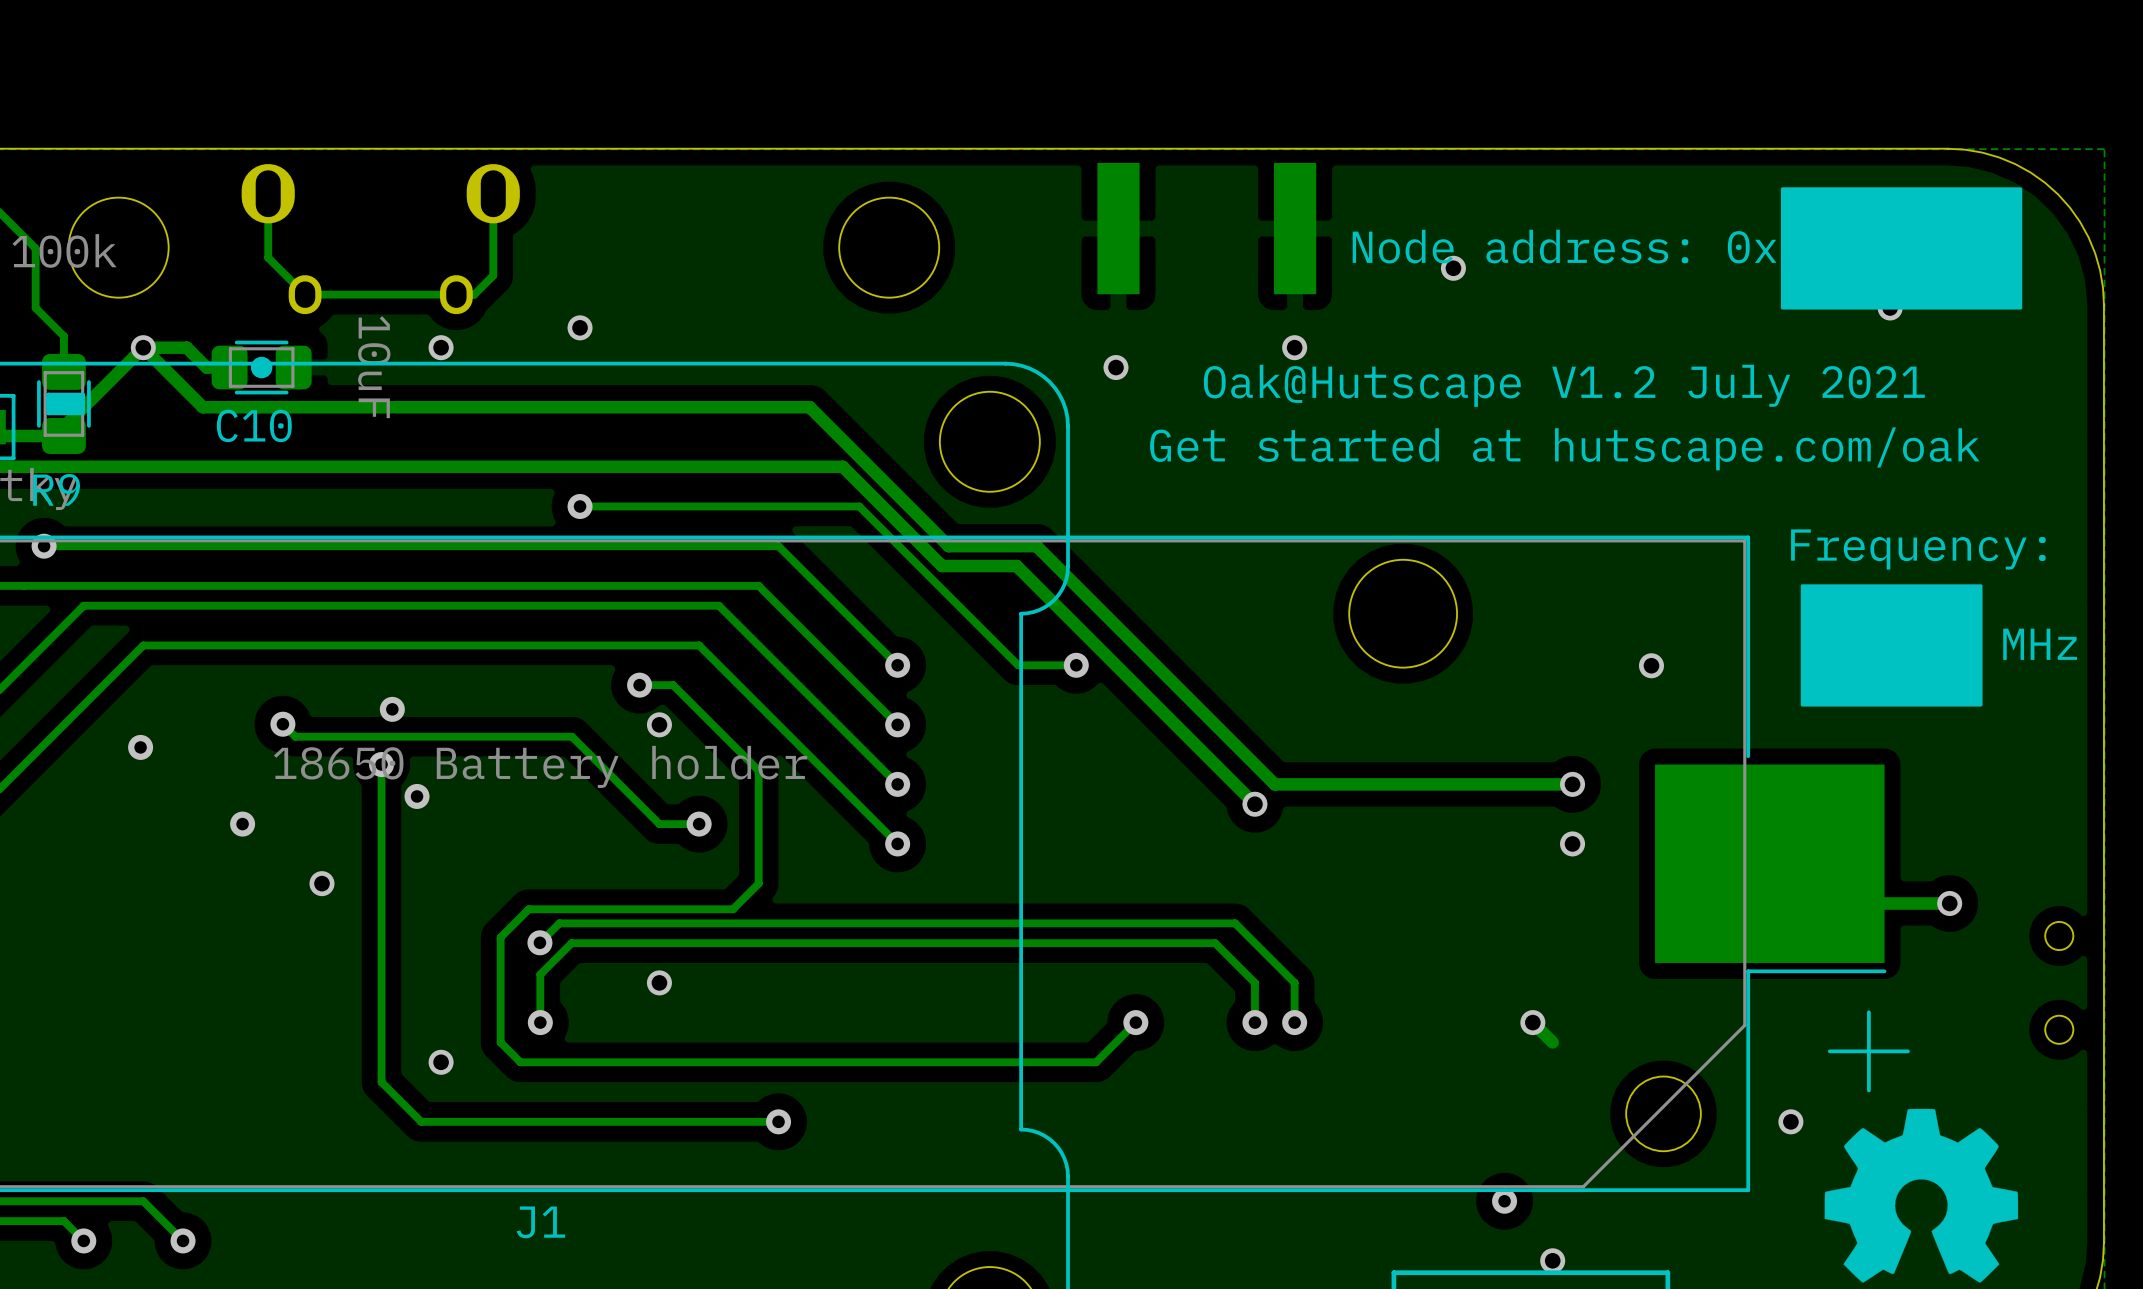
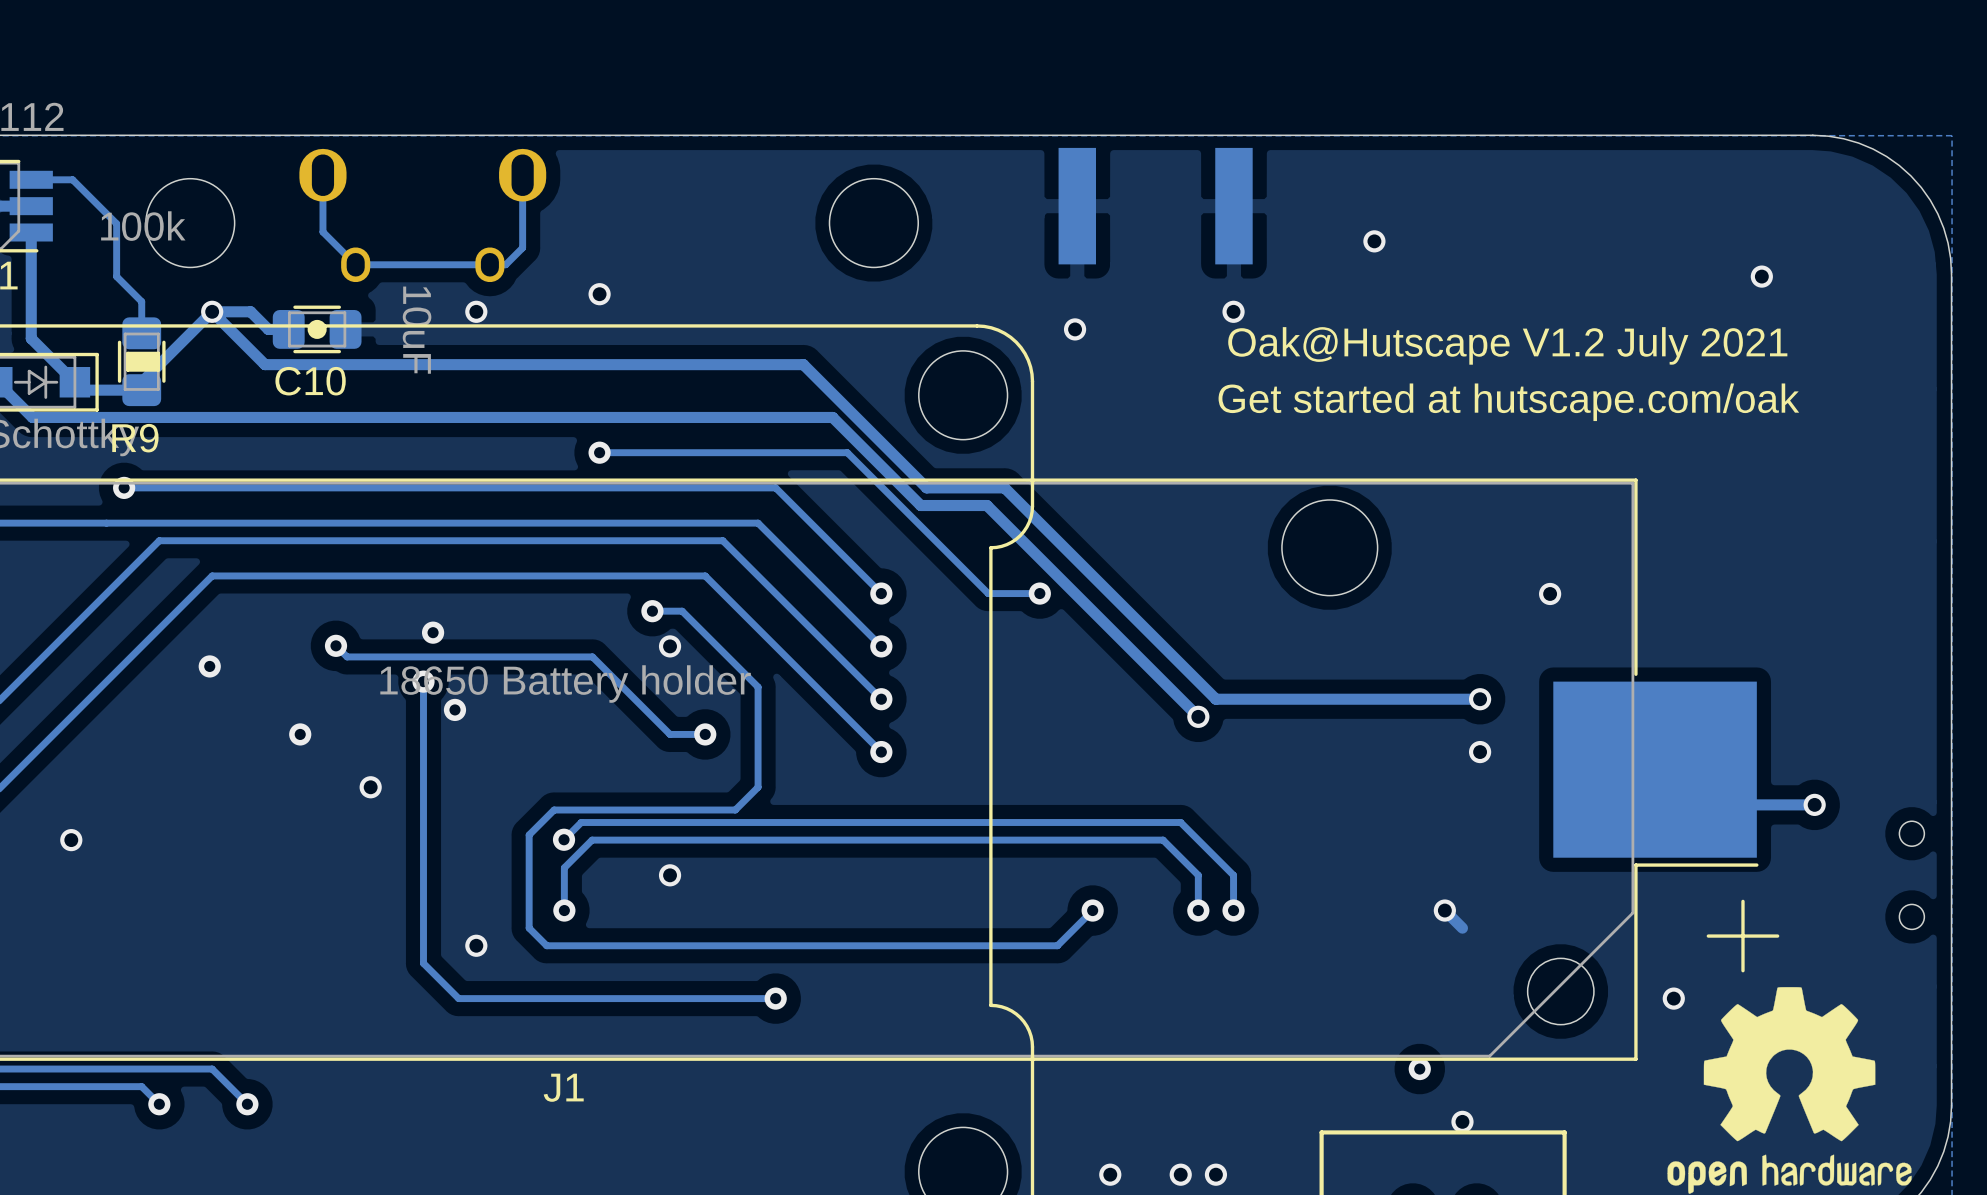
drawing: [1780, 187, 2023, 310] -> none
text: Node address: 0x (1564, 246) -> none
text position: Oak@Hutscape V1.2 July 2021 (1564, 385) -> Oak@Hutscape V1.2 July 2021 (1507, 345)
text position: Get started at hutscape.com/oak (1564, 448) -> Get started at hutscape.com/oak (1508, 402)
text: Frequency: (1918, 549) -> none
drawing: [1800, 584, 1983, 707] -> none
text: MHz (2040, 644) -> none

